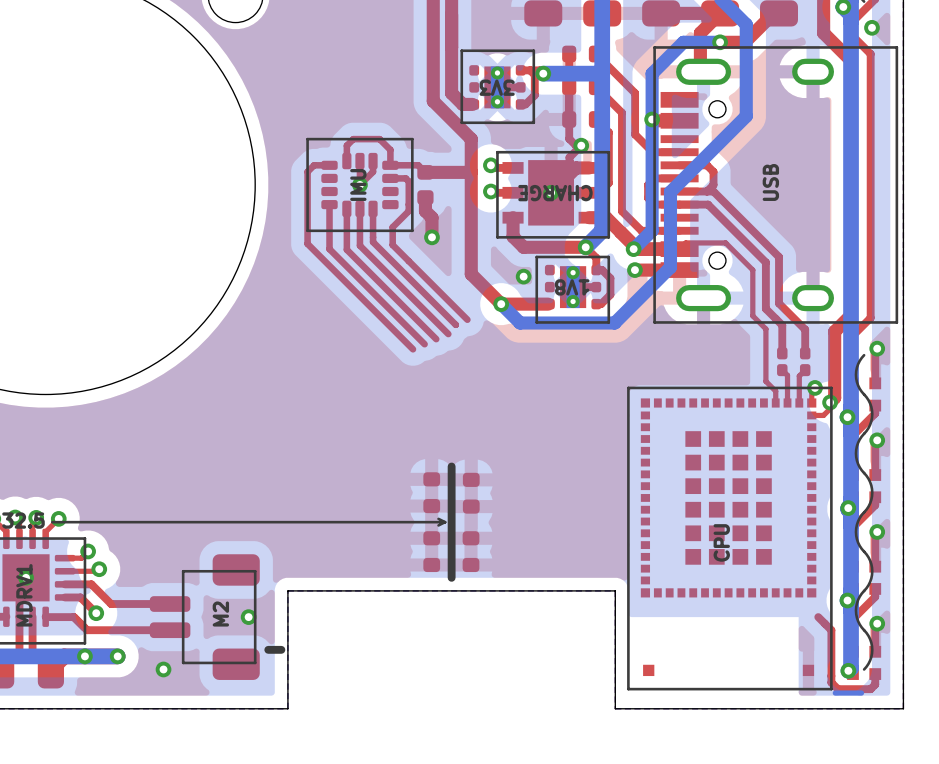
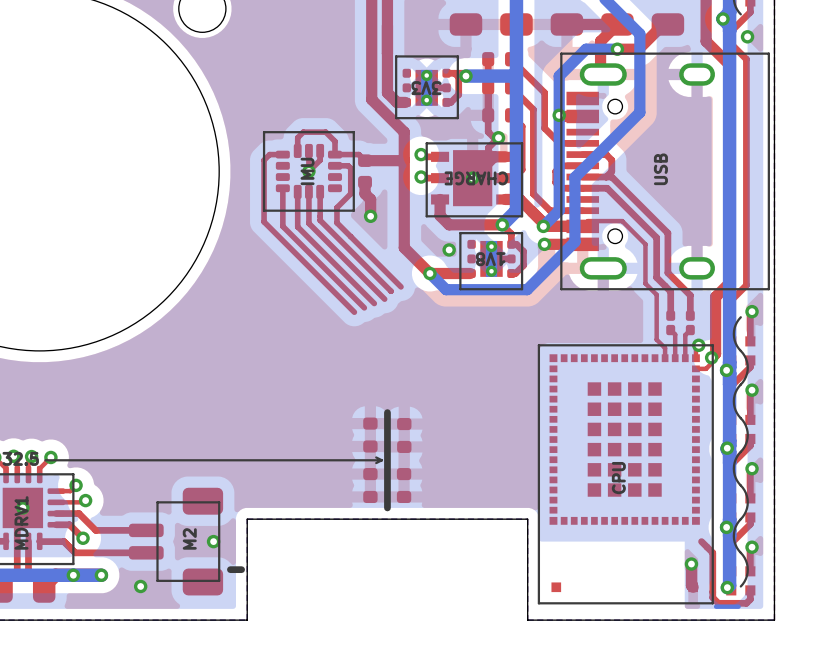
top track: none -> (691, 564) (691, 585) (693, 587)
via: none -> (691, 564)

